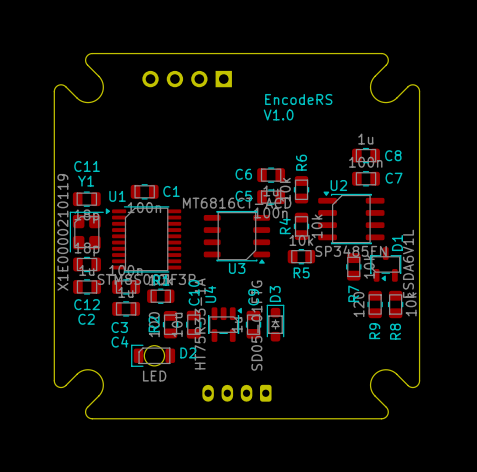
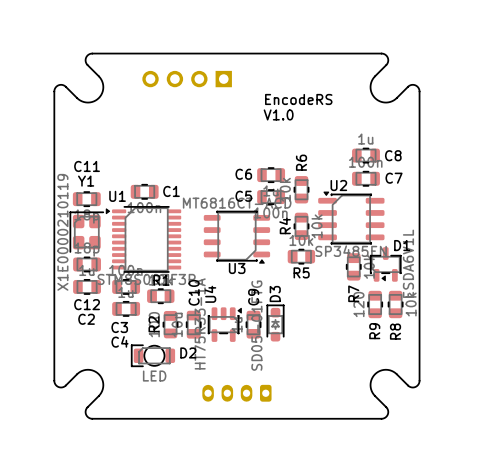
D1 name rotation: 0° (397, 243) -> 90° clockwise (402, 245)

